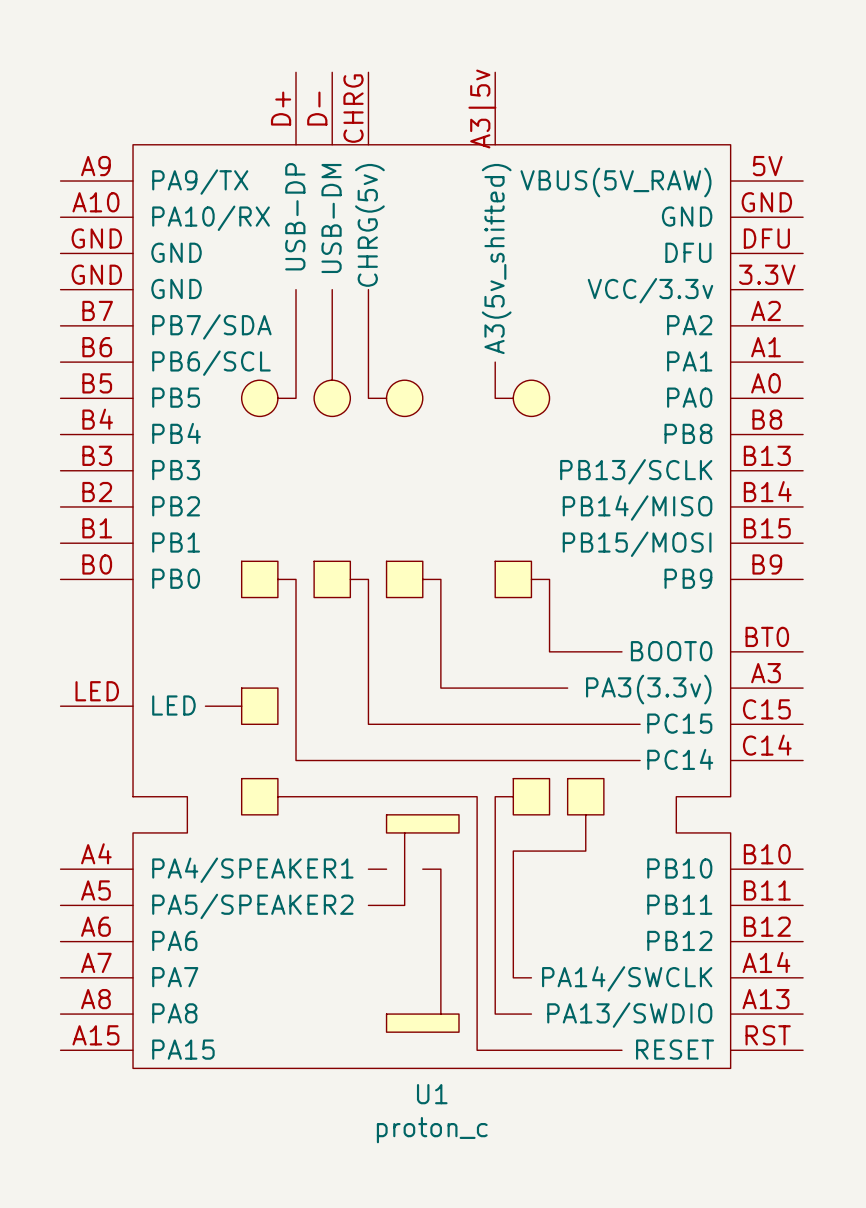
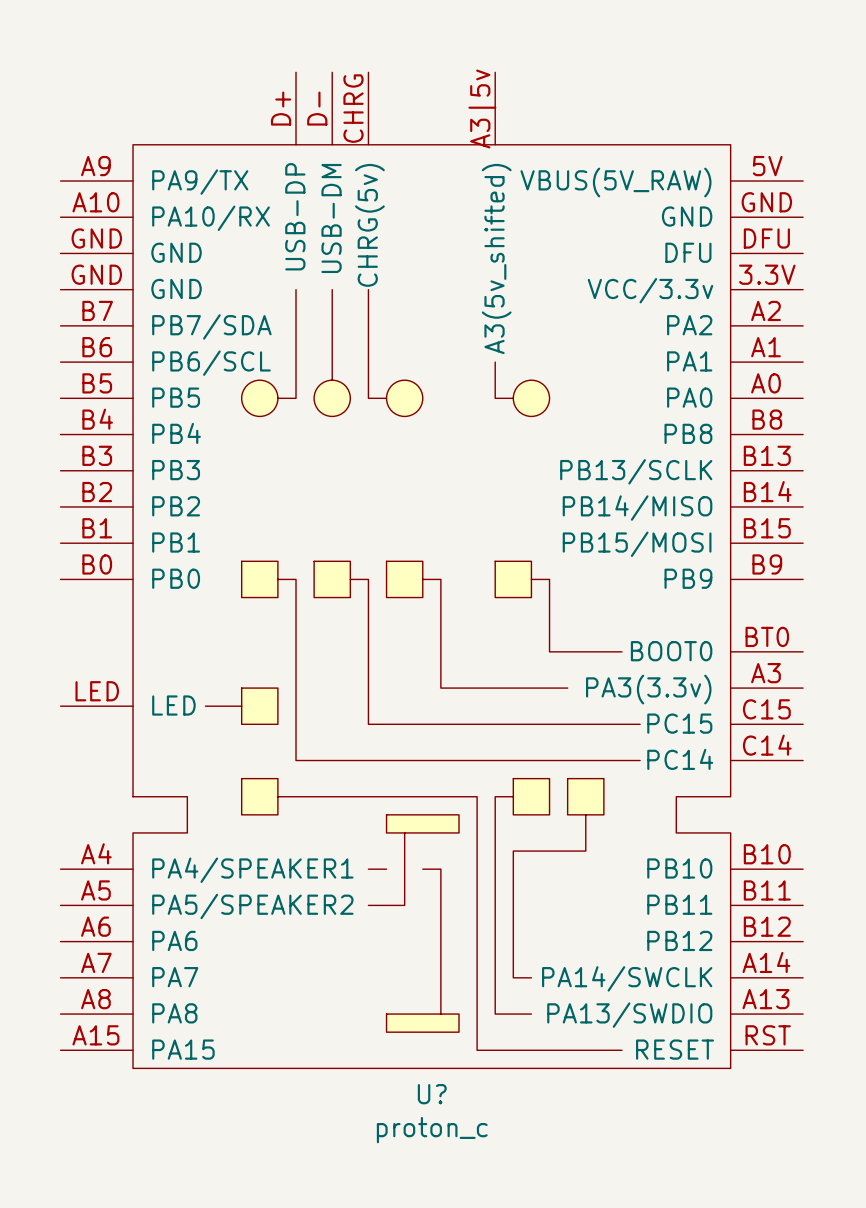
U1 name: U1 (432, 1094) -> U? (432, 1094)

